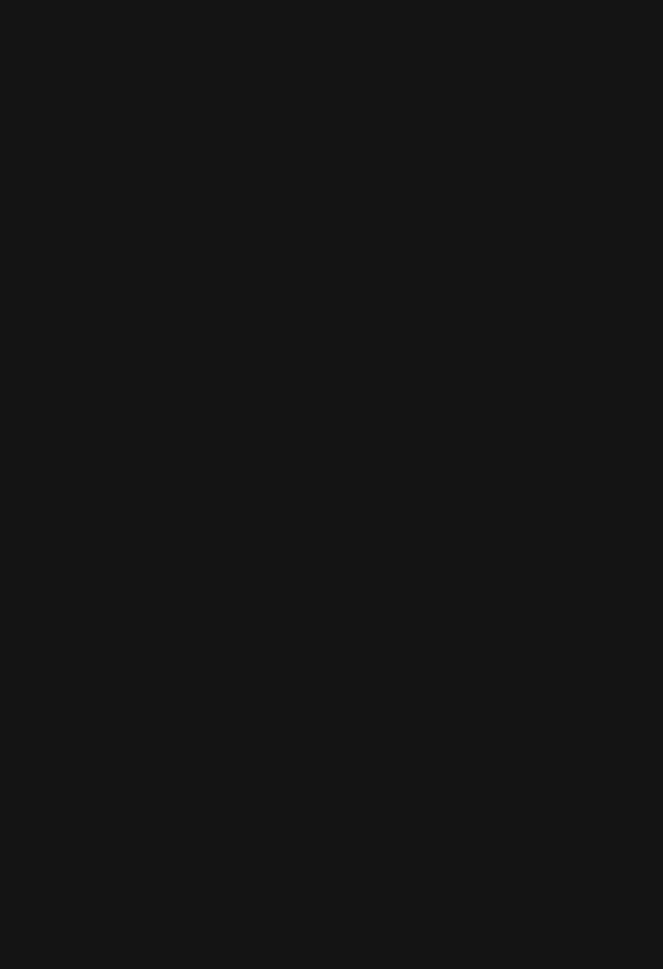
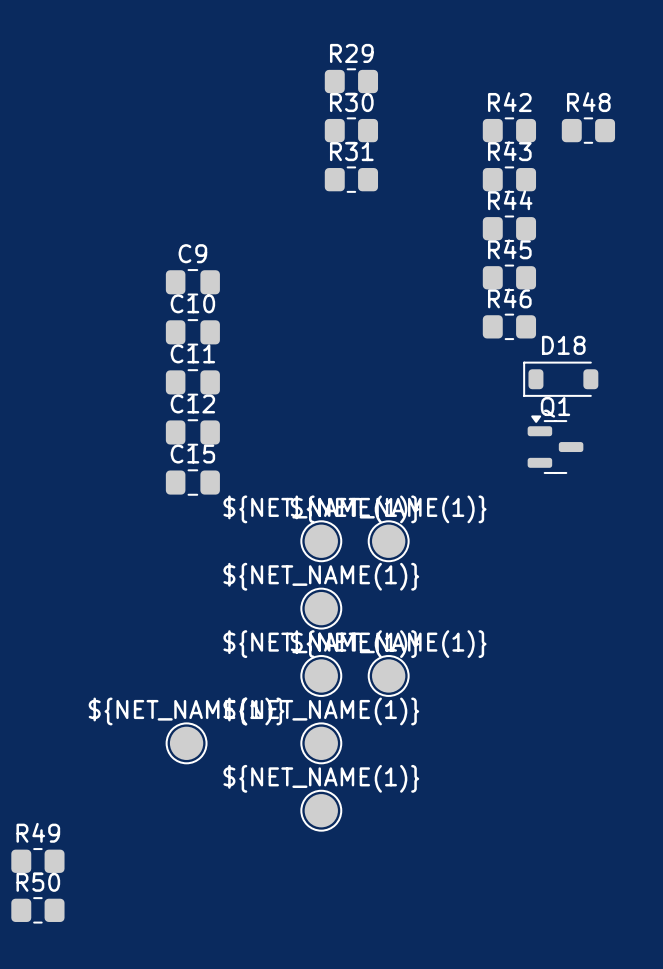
R29: none -> (351, 81)
R30: none -> (351, 130)
R42: none -> (509, 130)
R48: none -> (588, 130)
R31: none -> (351, 179)
R43: none -> (509, 179)
R44: none -> (509, 228)
R45: none -> (509, 277)
C9: none -> (192, 282)
R46: none -> (509, 326)
C10: none -> (192, 332)
D18: none -> (560, 379)
C11: none -> (192, 382)
C12: none -> (192, 432)
Q1: none -> (555, 444)
C15: none -> (192, 482)
part: none -> (321, 541)
part: none -> (388, 541)
part: none -> (321, 608)
part: none -> (321, 675)
part: none -> (388, 675)
part: none -> (186, 743)
part: none -> (321, 743)
part: none -> (321, 810)
R49: none -> (37, 861)
R50: none -> (37, 910)

